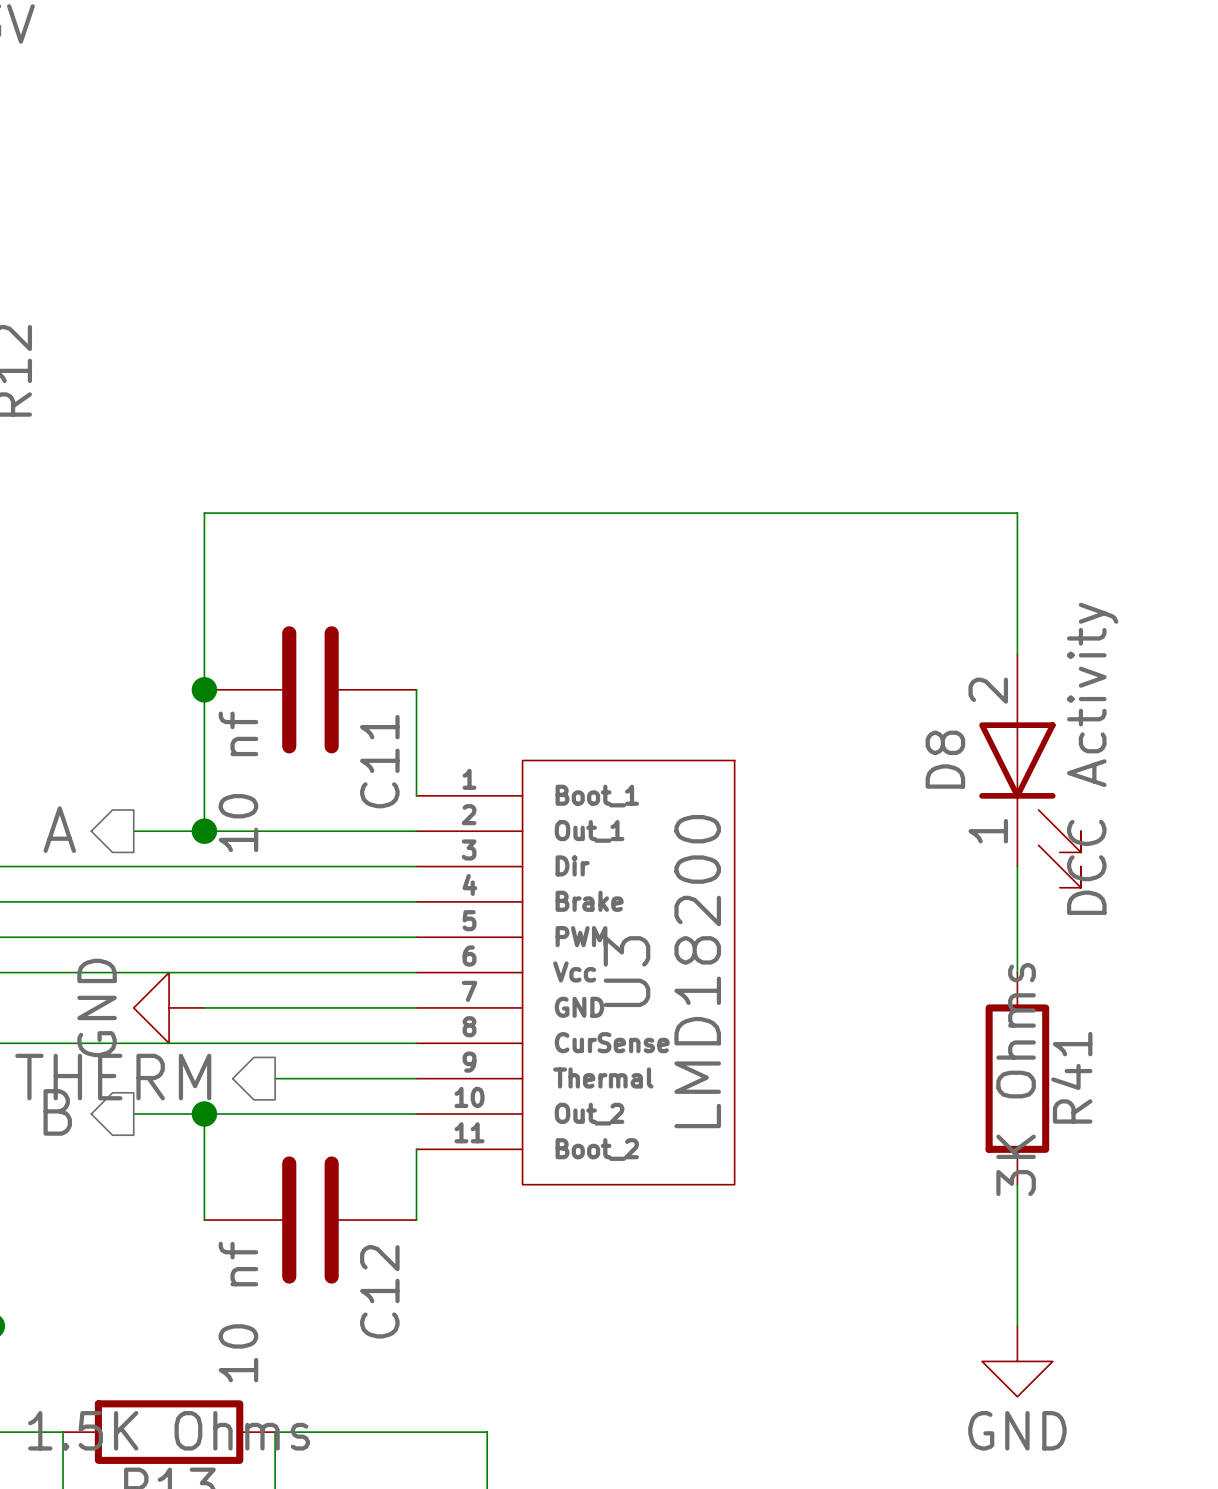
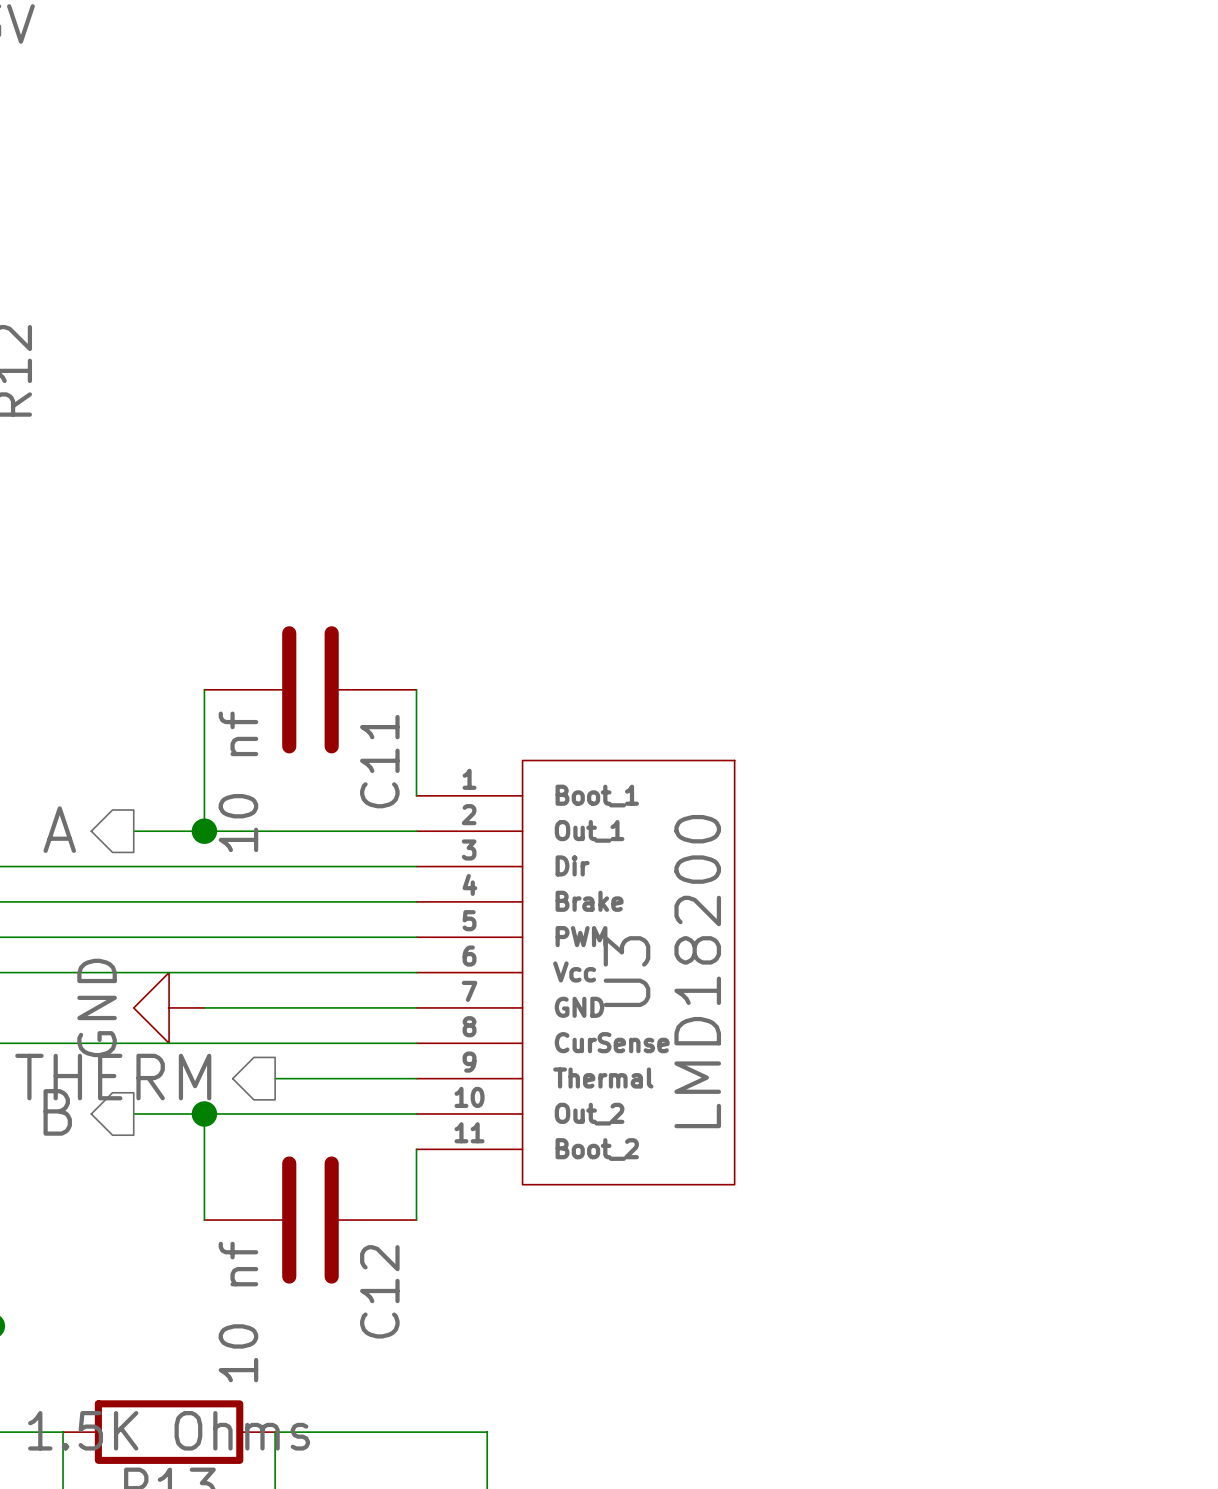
wire: (1017, 654) (1017, 513) (204, 513) (204, 689) -> none
junction: (204, 689) -> none
D8: DCC Activity (1030, 771) -> none
wire: (1017, 866) (1017, 972) -> none
R41: 3K Ohms (1017, 1078) -> none
wire: (1017, 1184) (1017, 1326) -> none
power symbol: GND (1017, 1361) -> none

